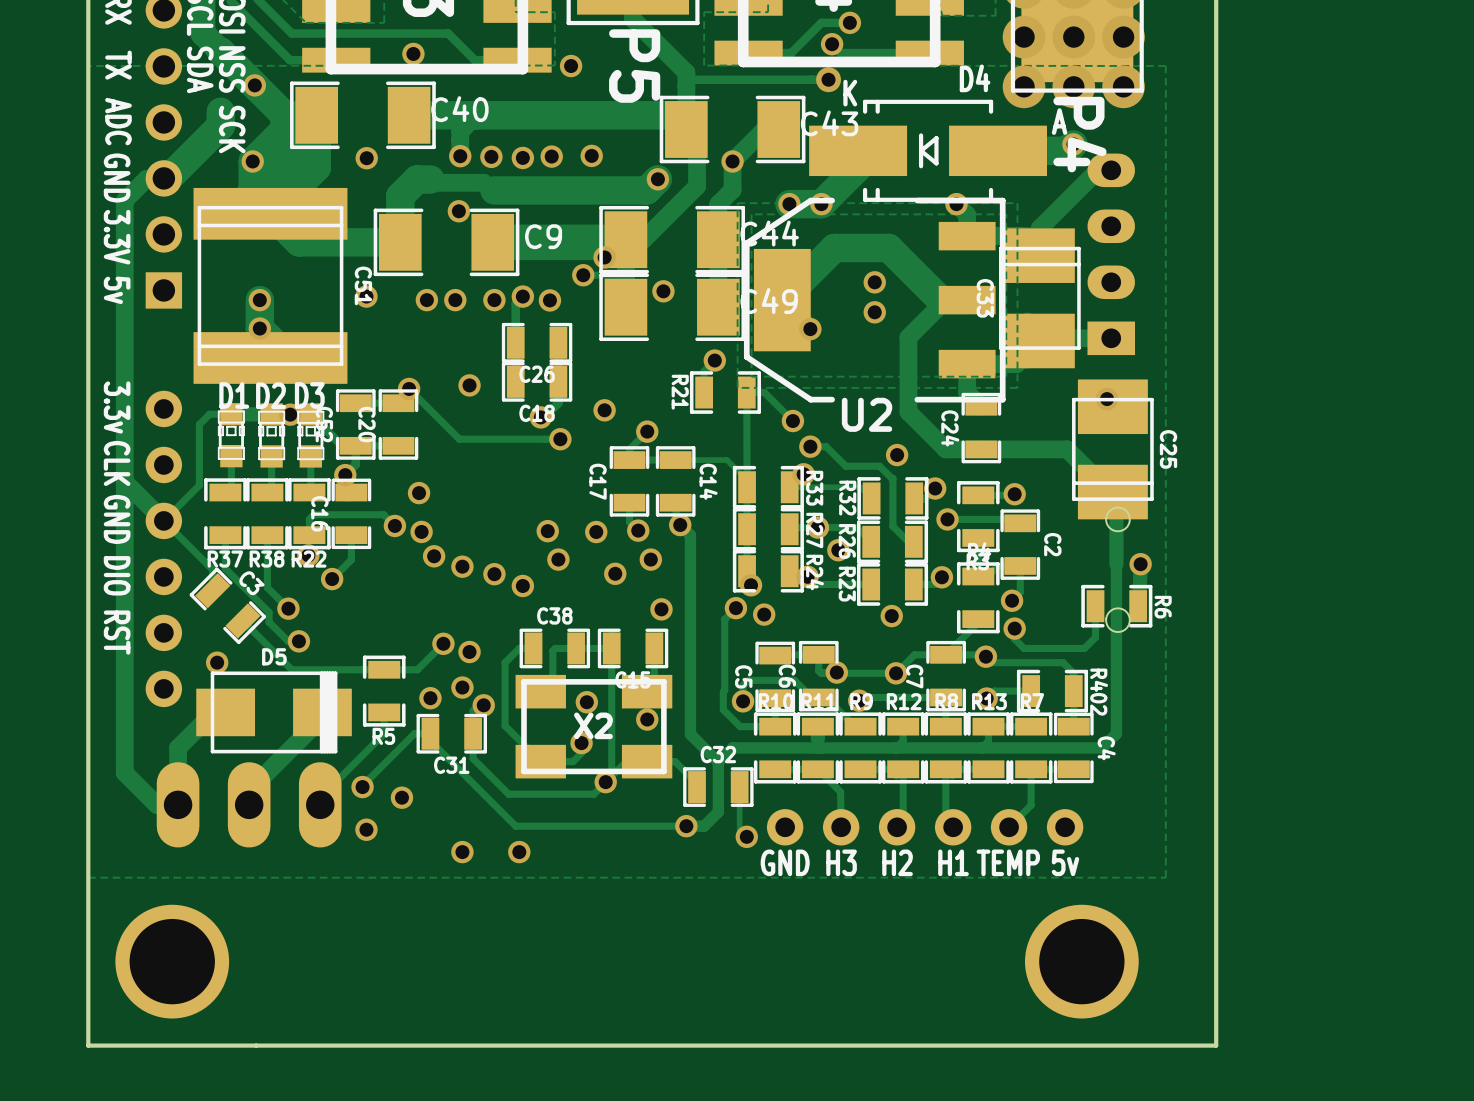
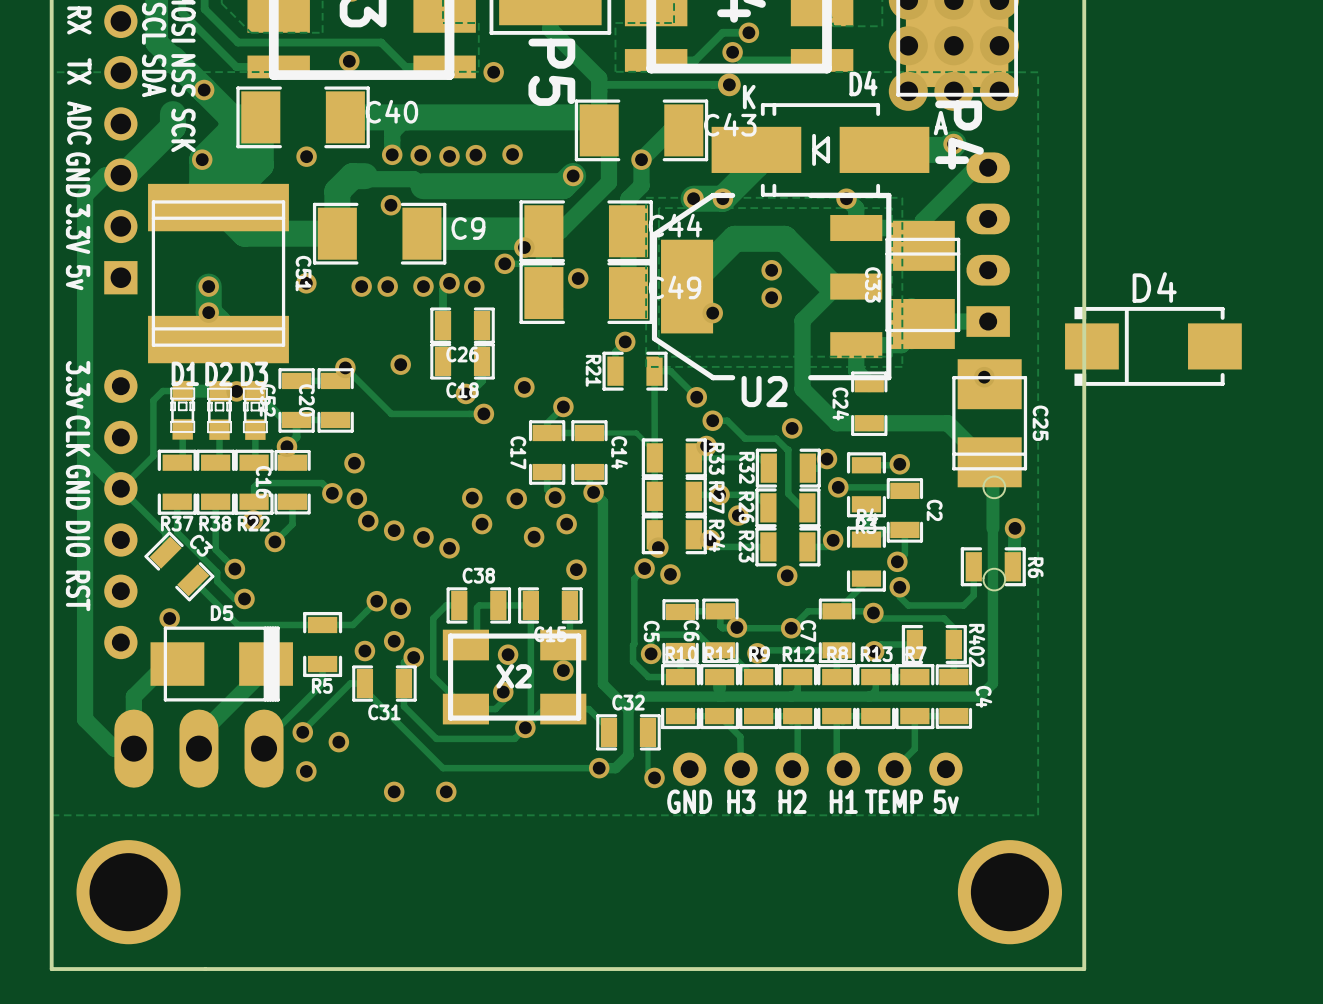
D4: none -> (1153, 346)
part position: (1081, 961) -> (1009, 892)

